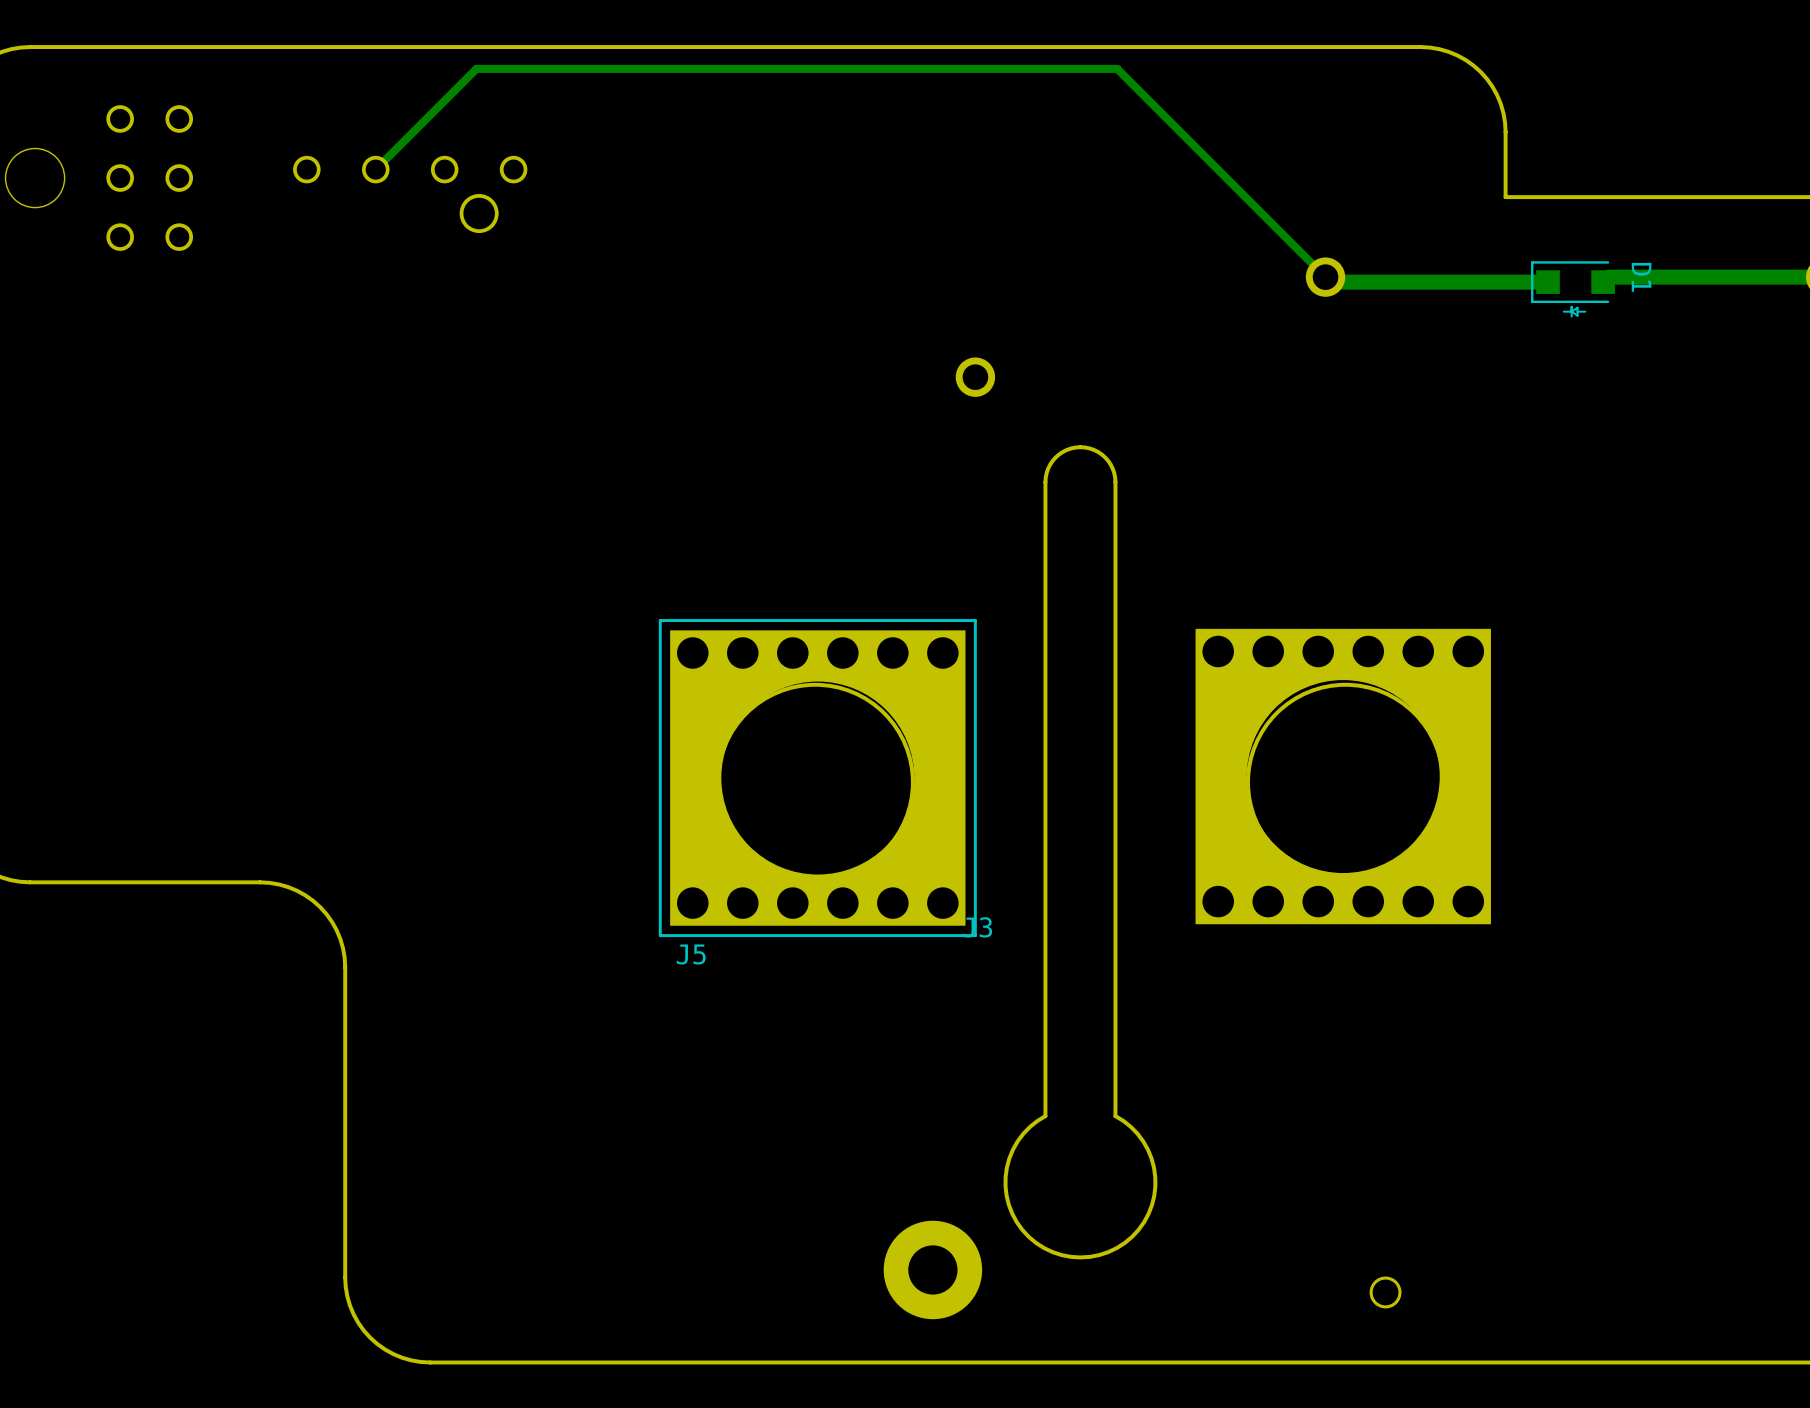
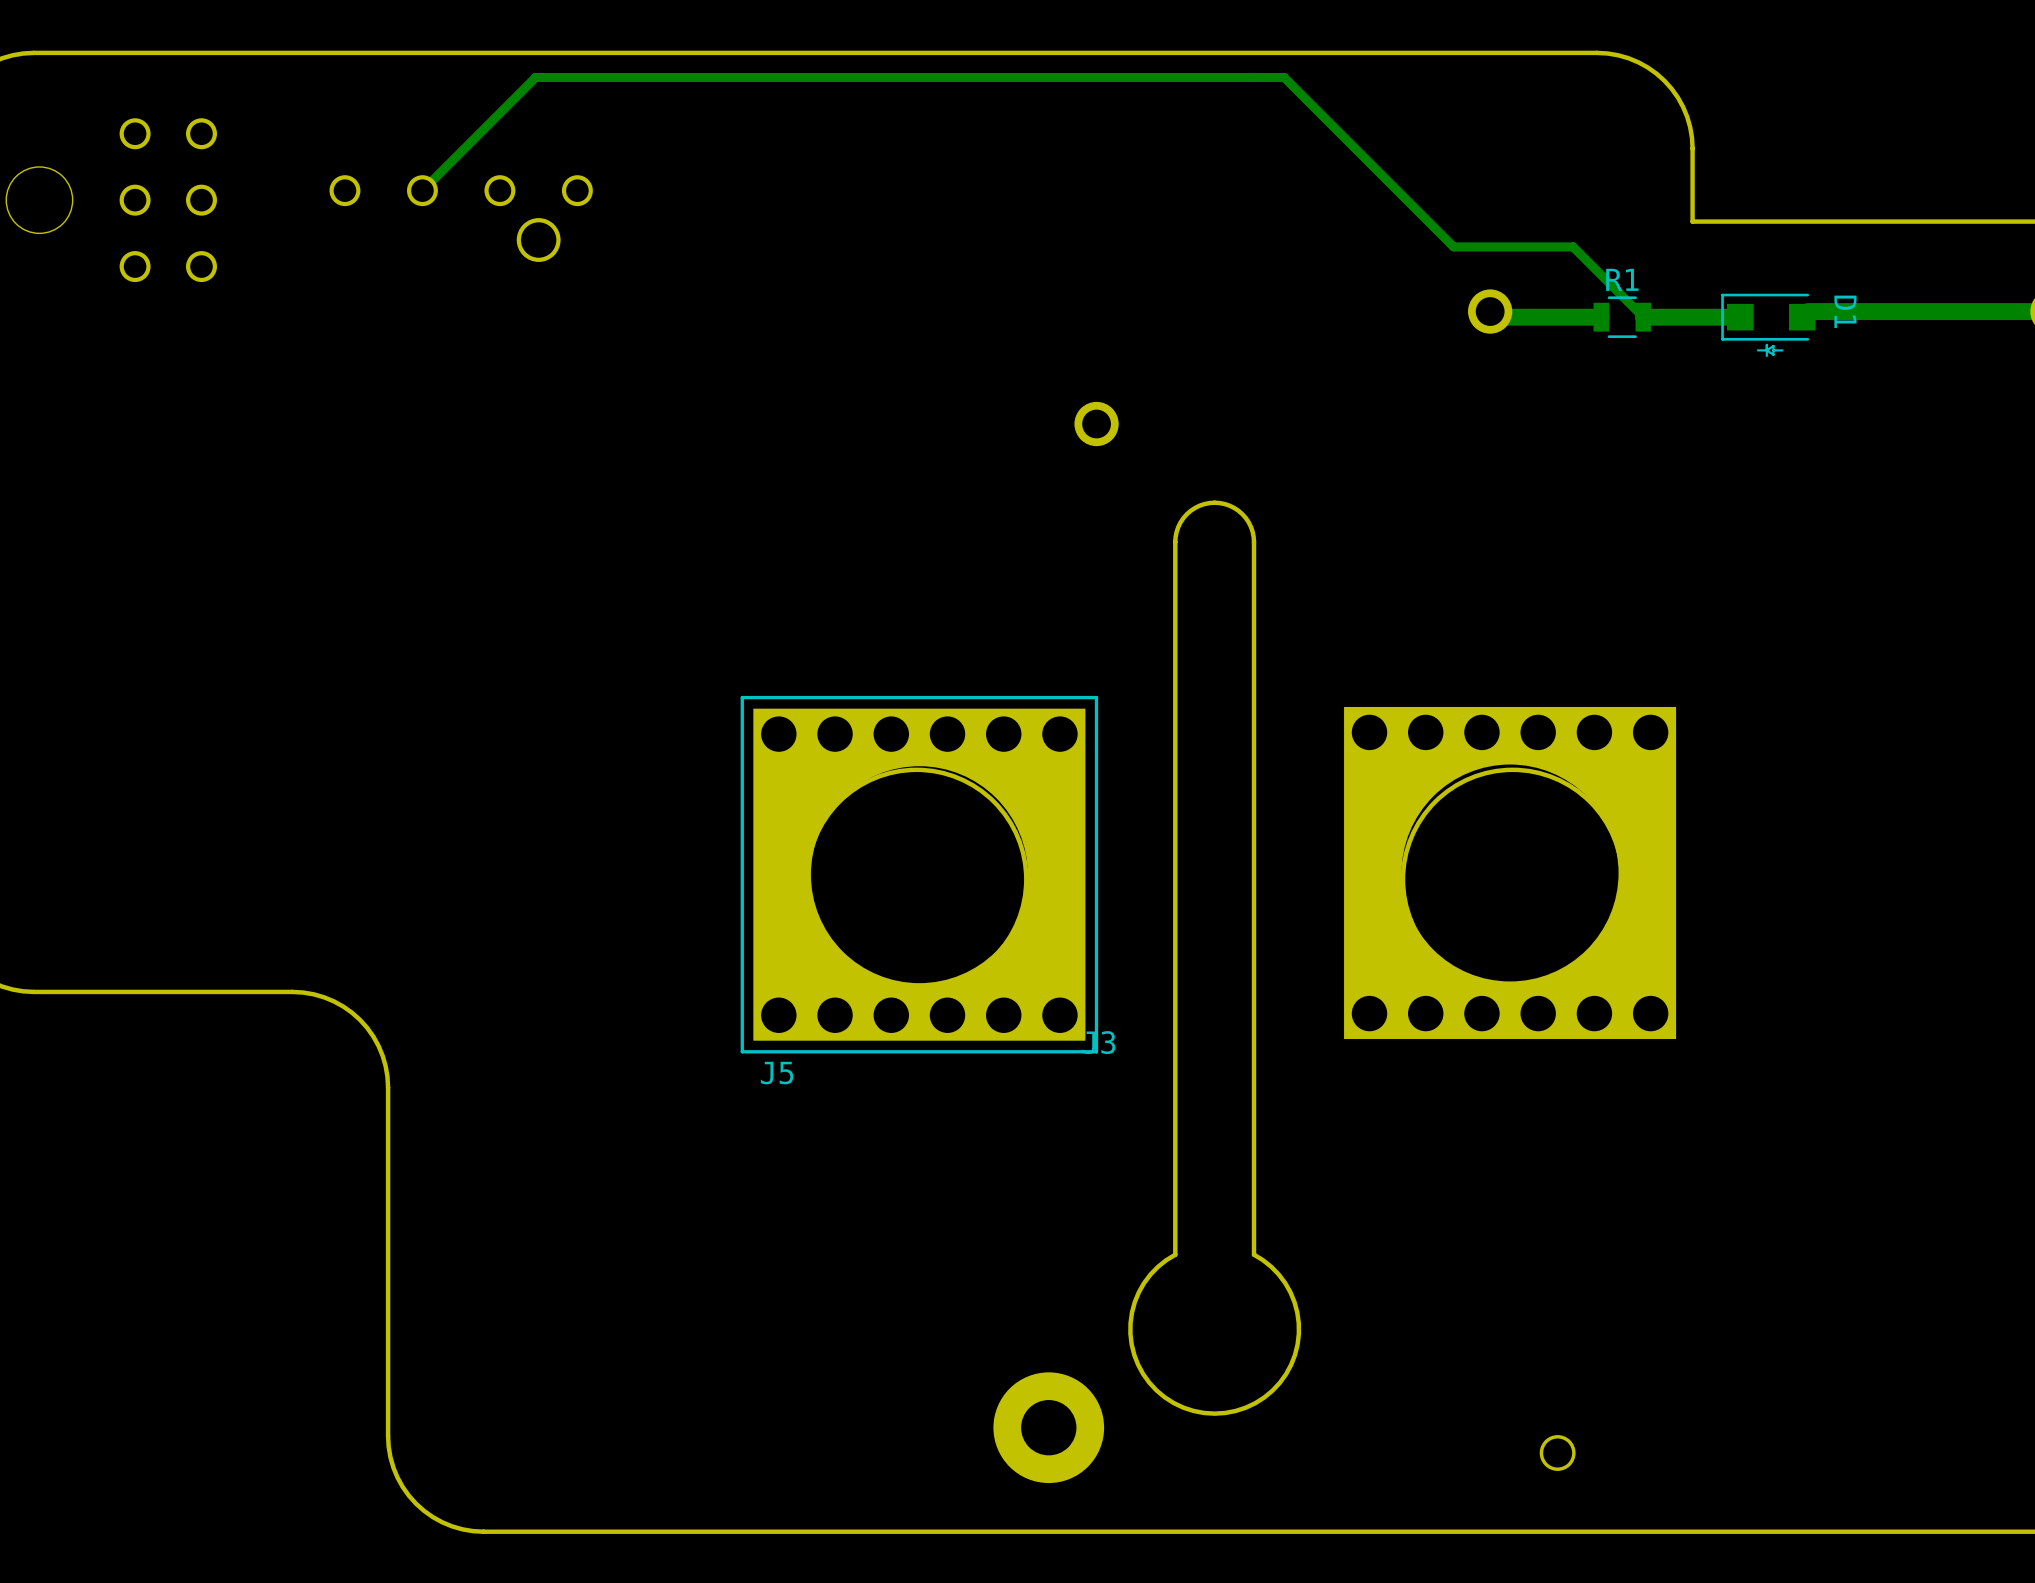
track: (1117, 68) (1325, 277) -> (1256, 77) (1284, 77) (1453, 246) (1573, 246) (1643, 317)
R1: none -> (1622, 317)
track: (1461, 282) (1424, 282) -> none

